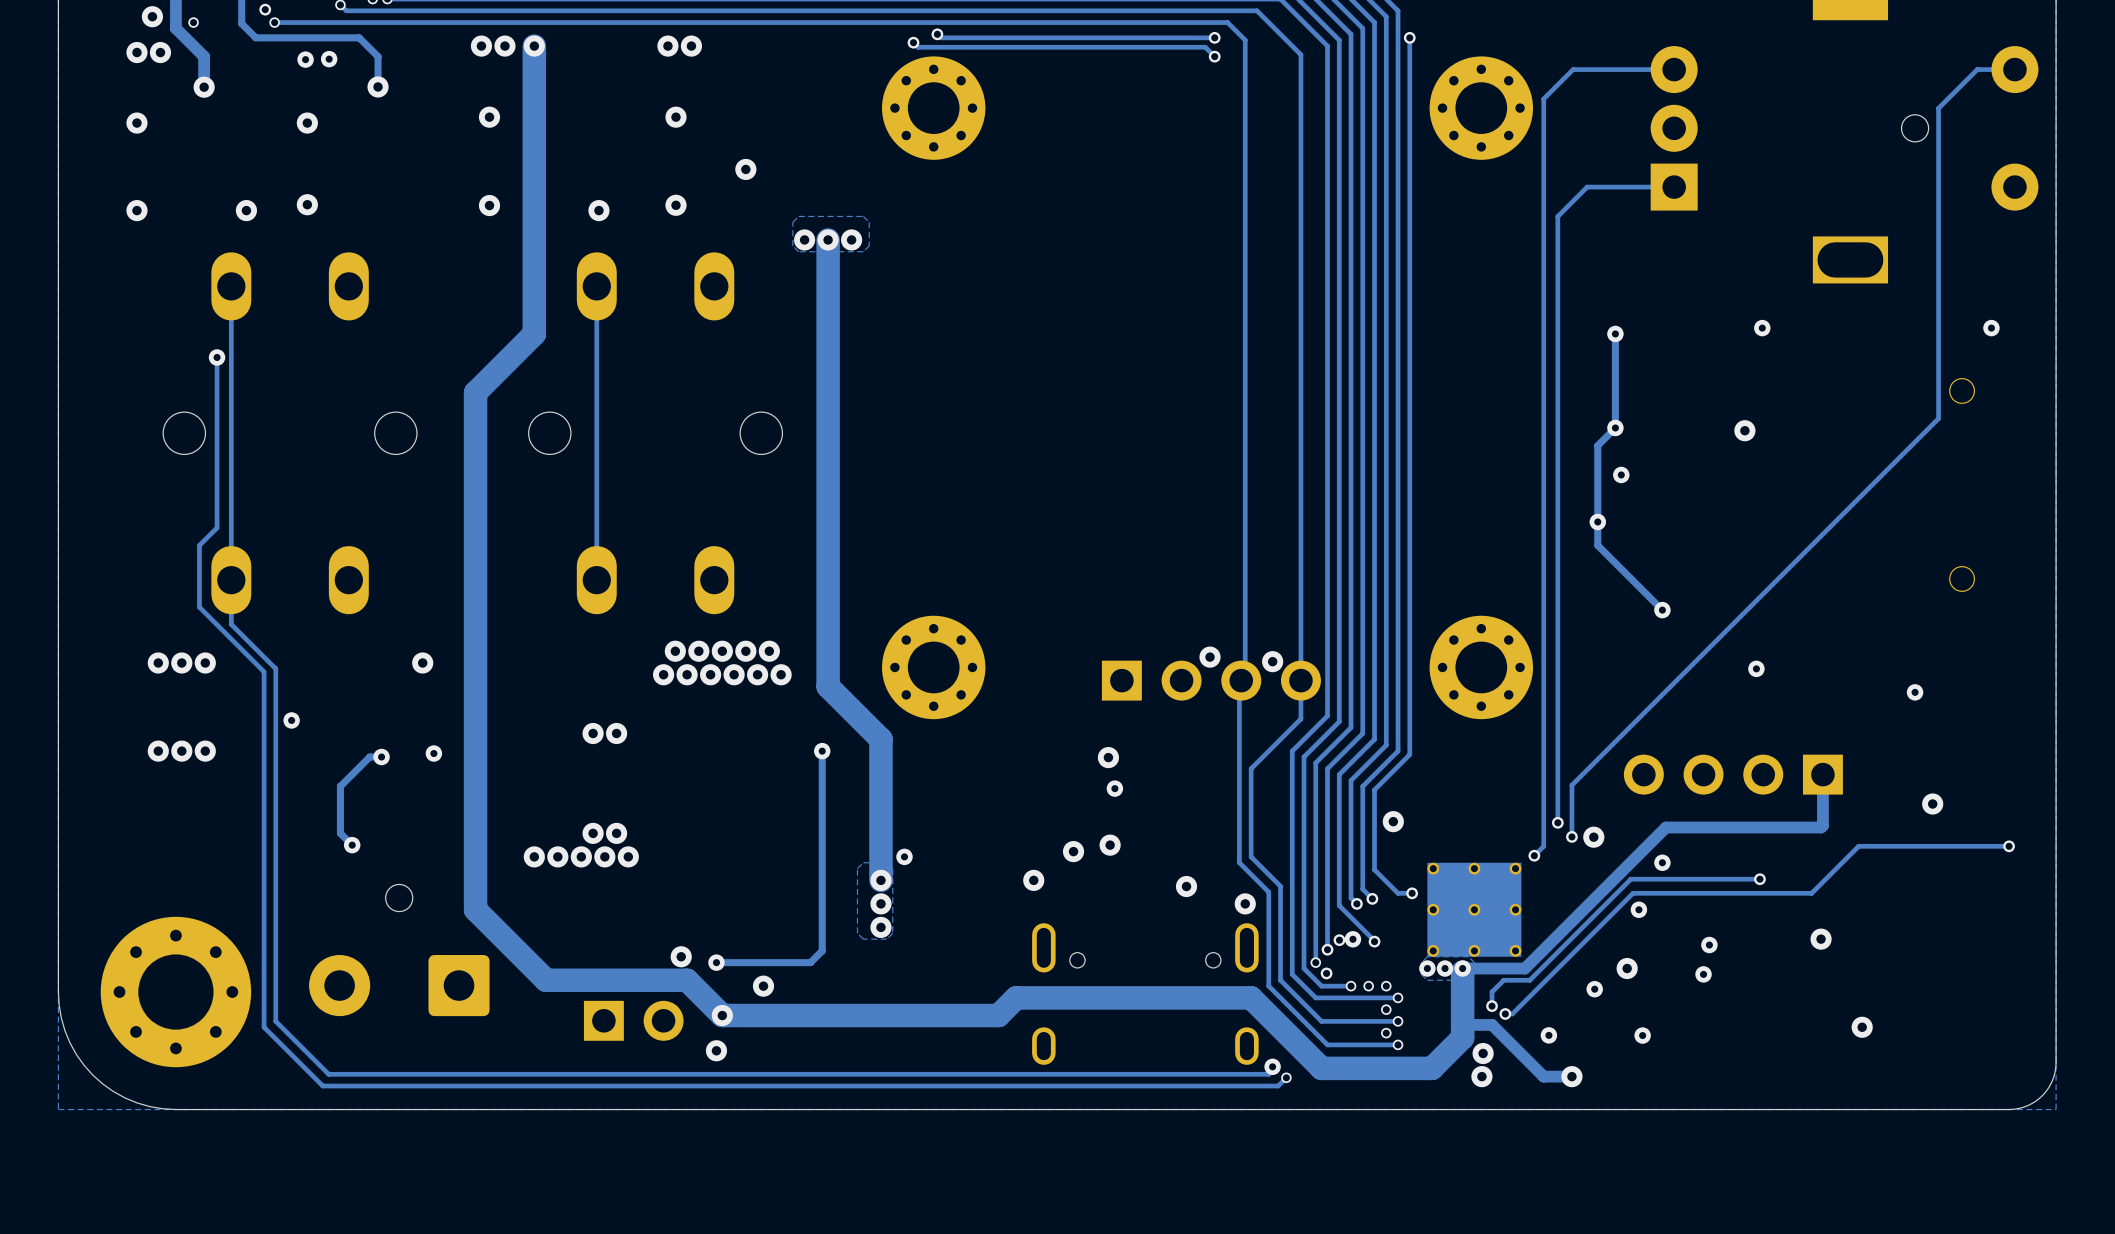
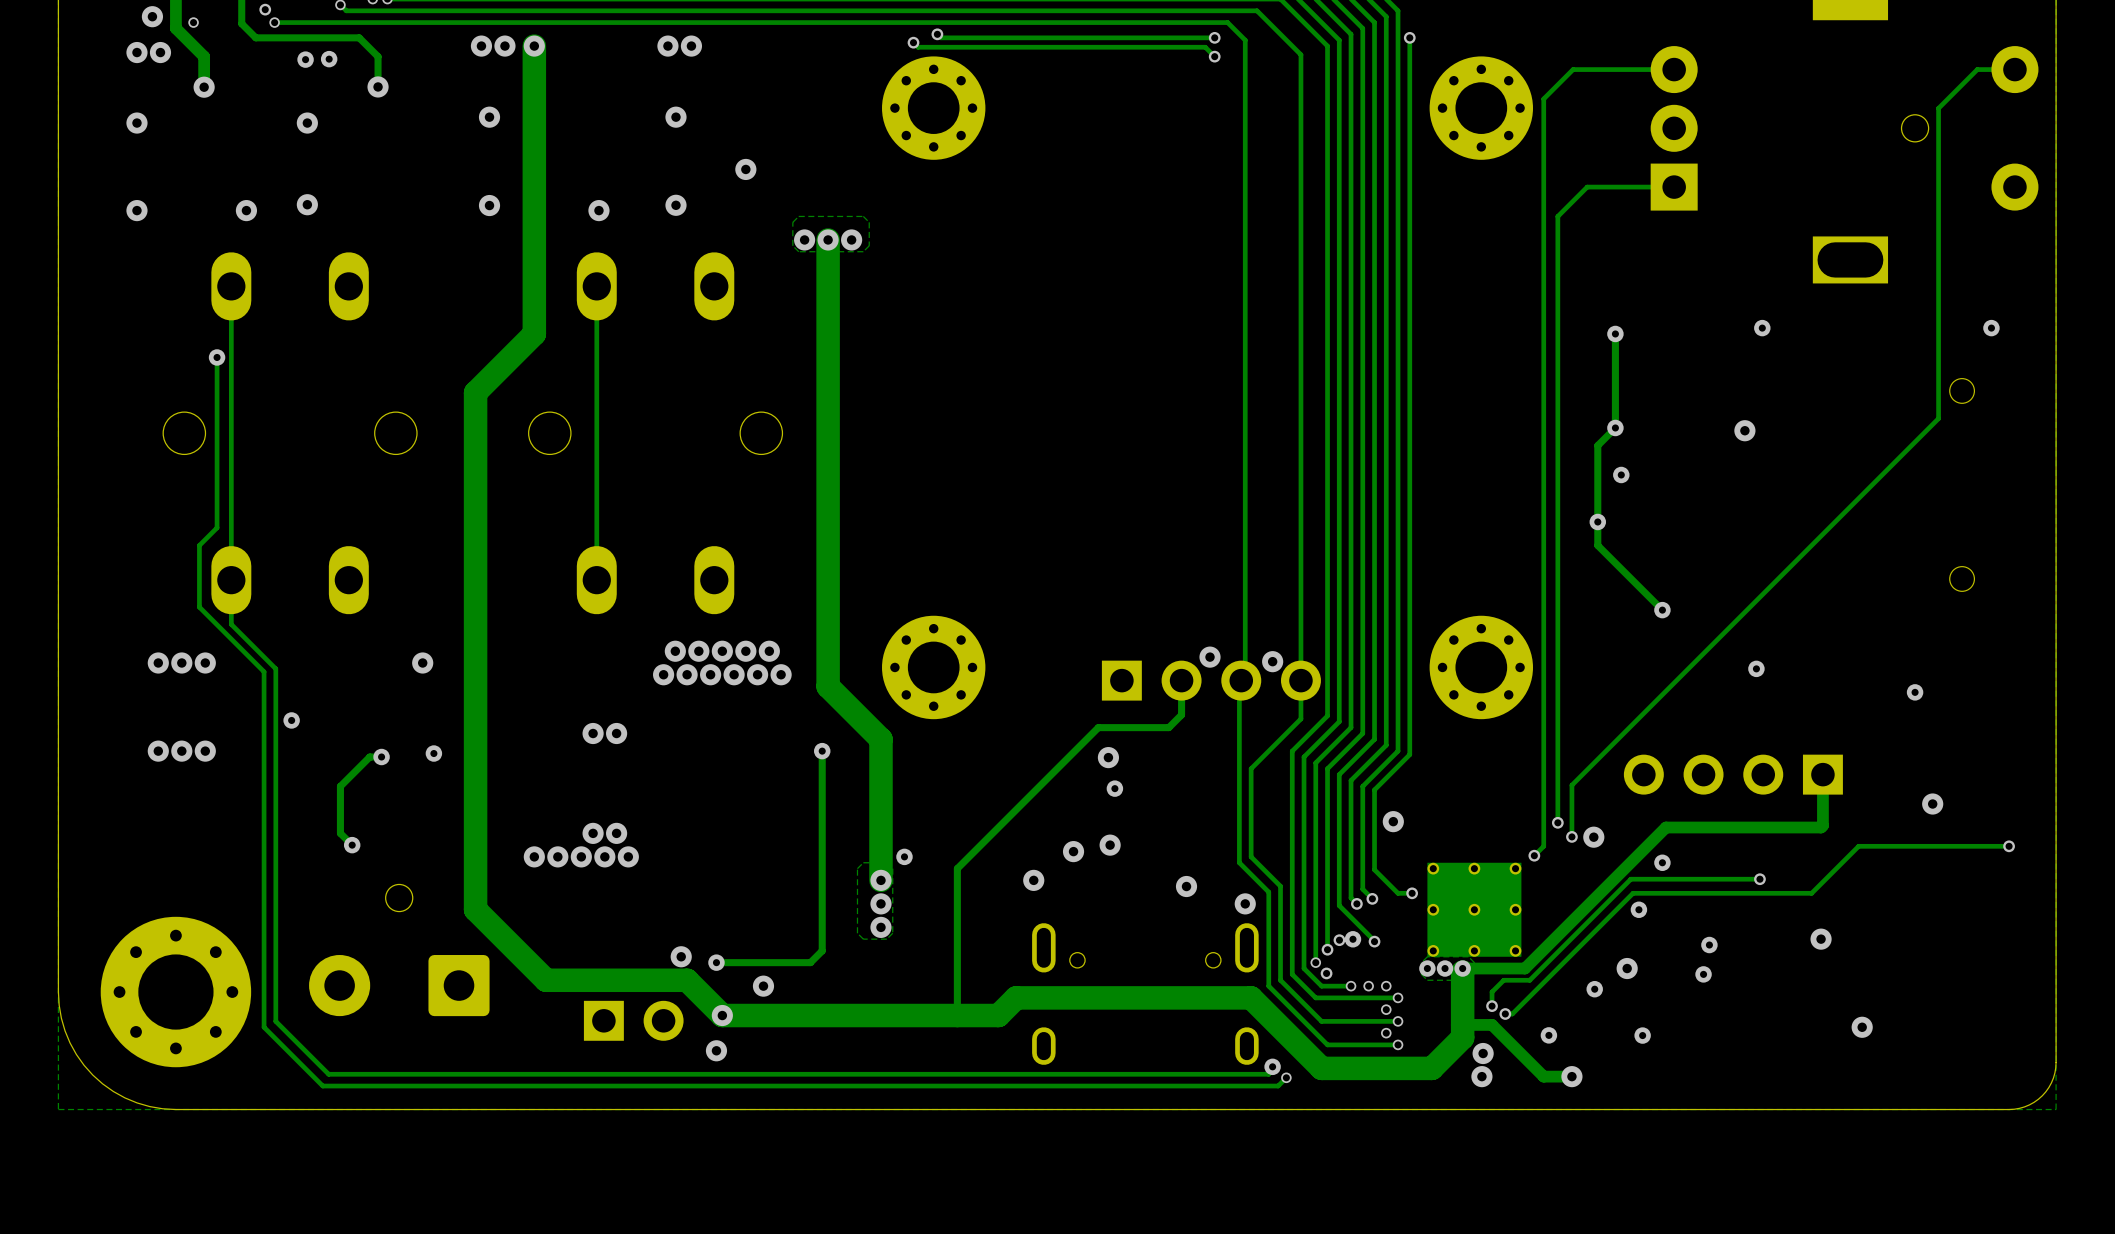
track: none -> (1181, 680) (1181, 714) (1168, 727) (1098, 727) (957, 868) (957, 1015)

